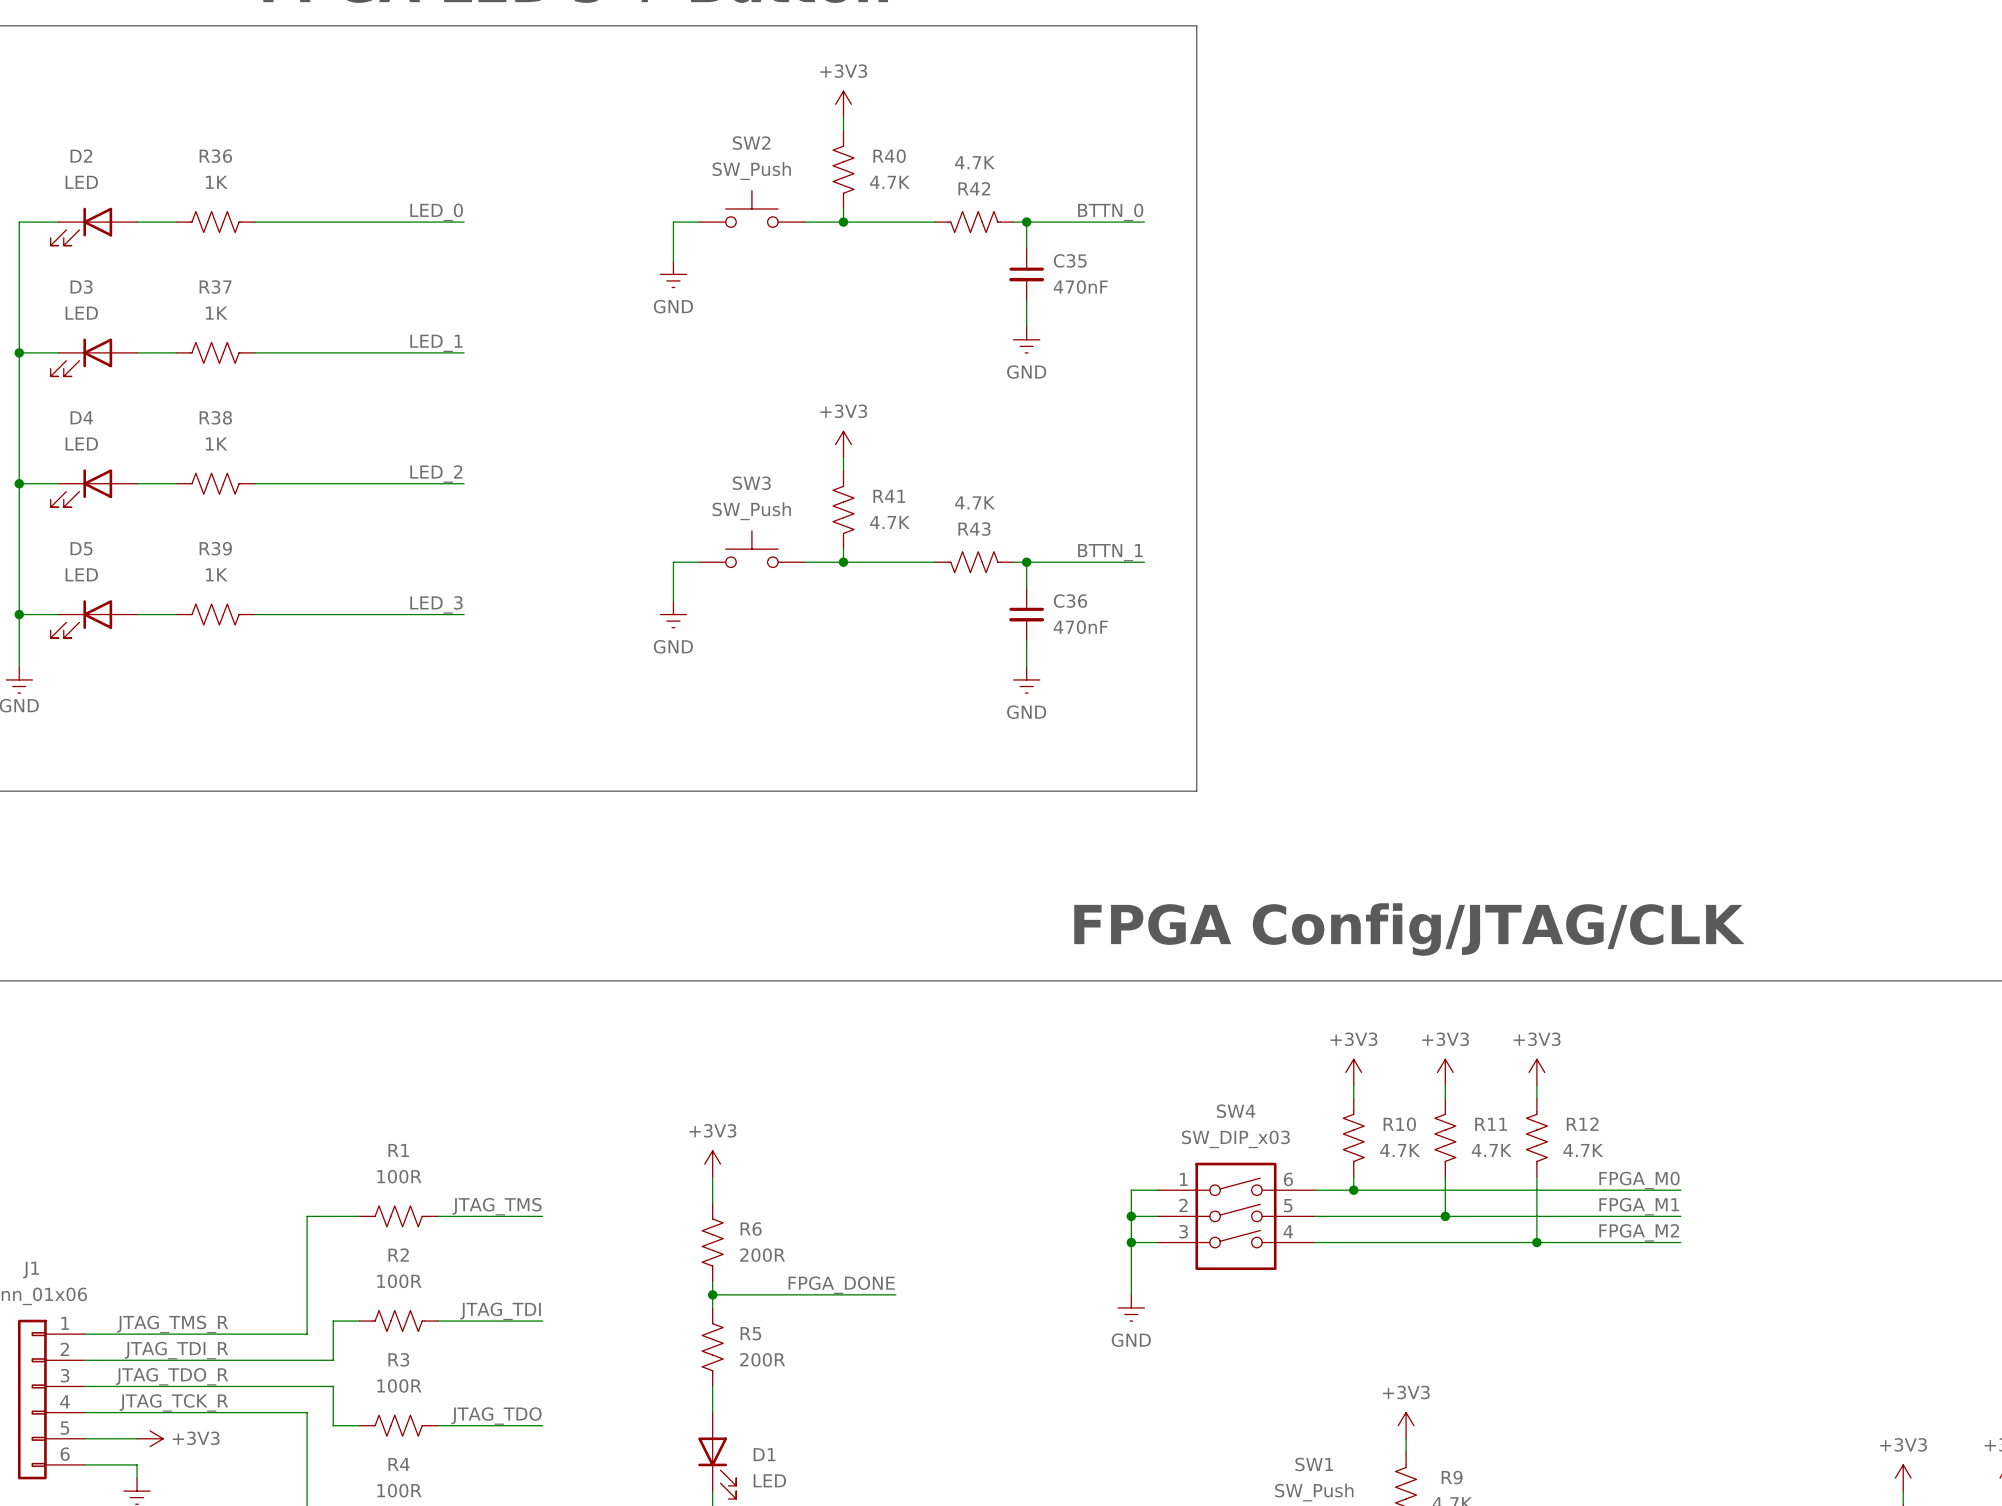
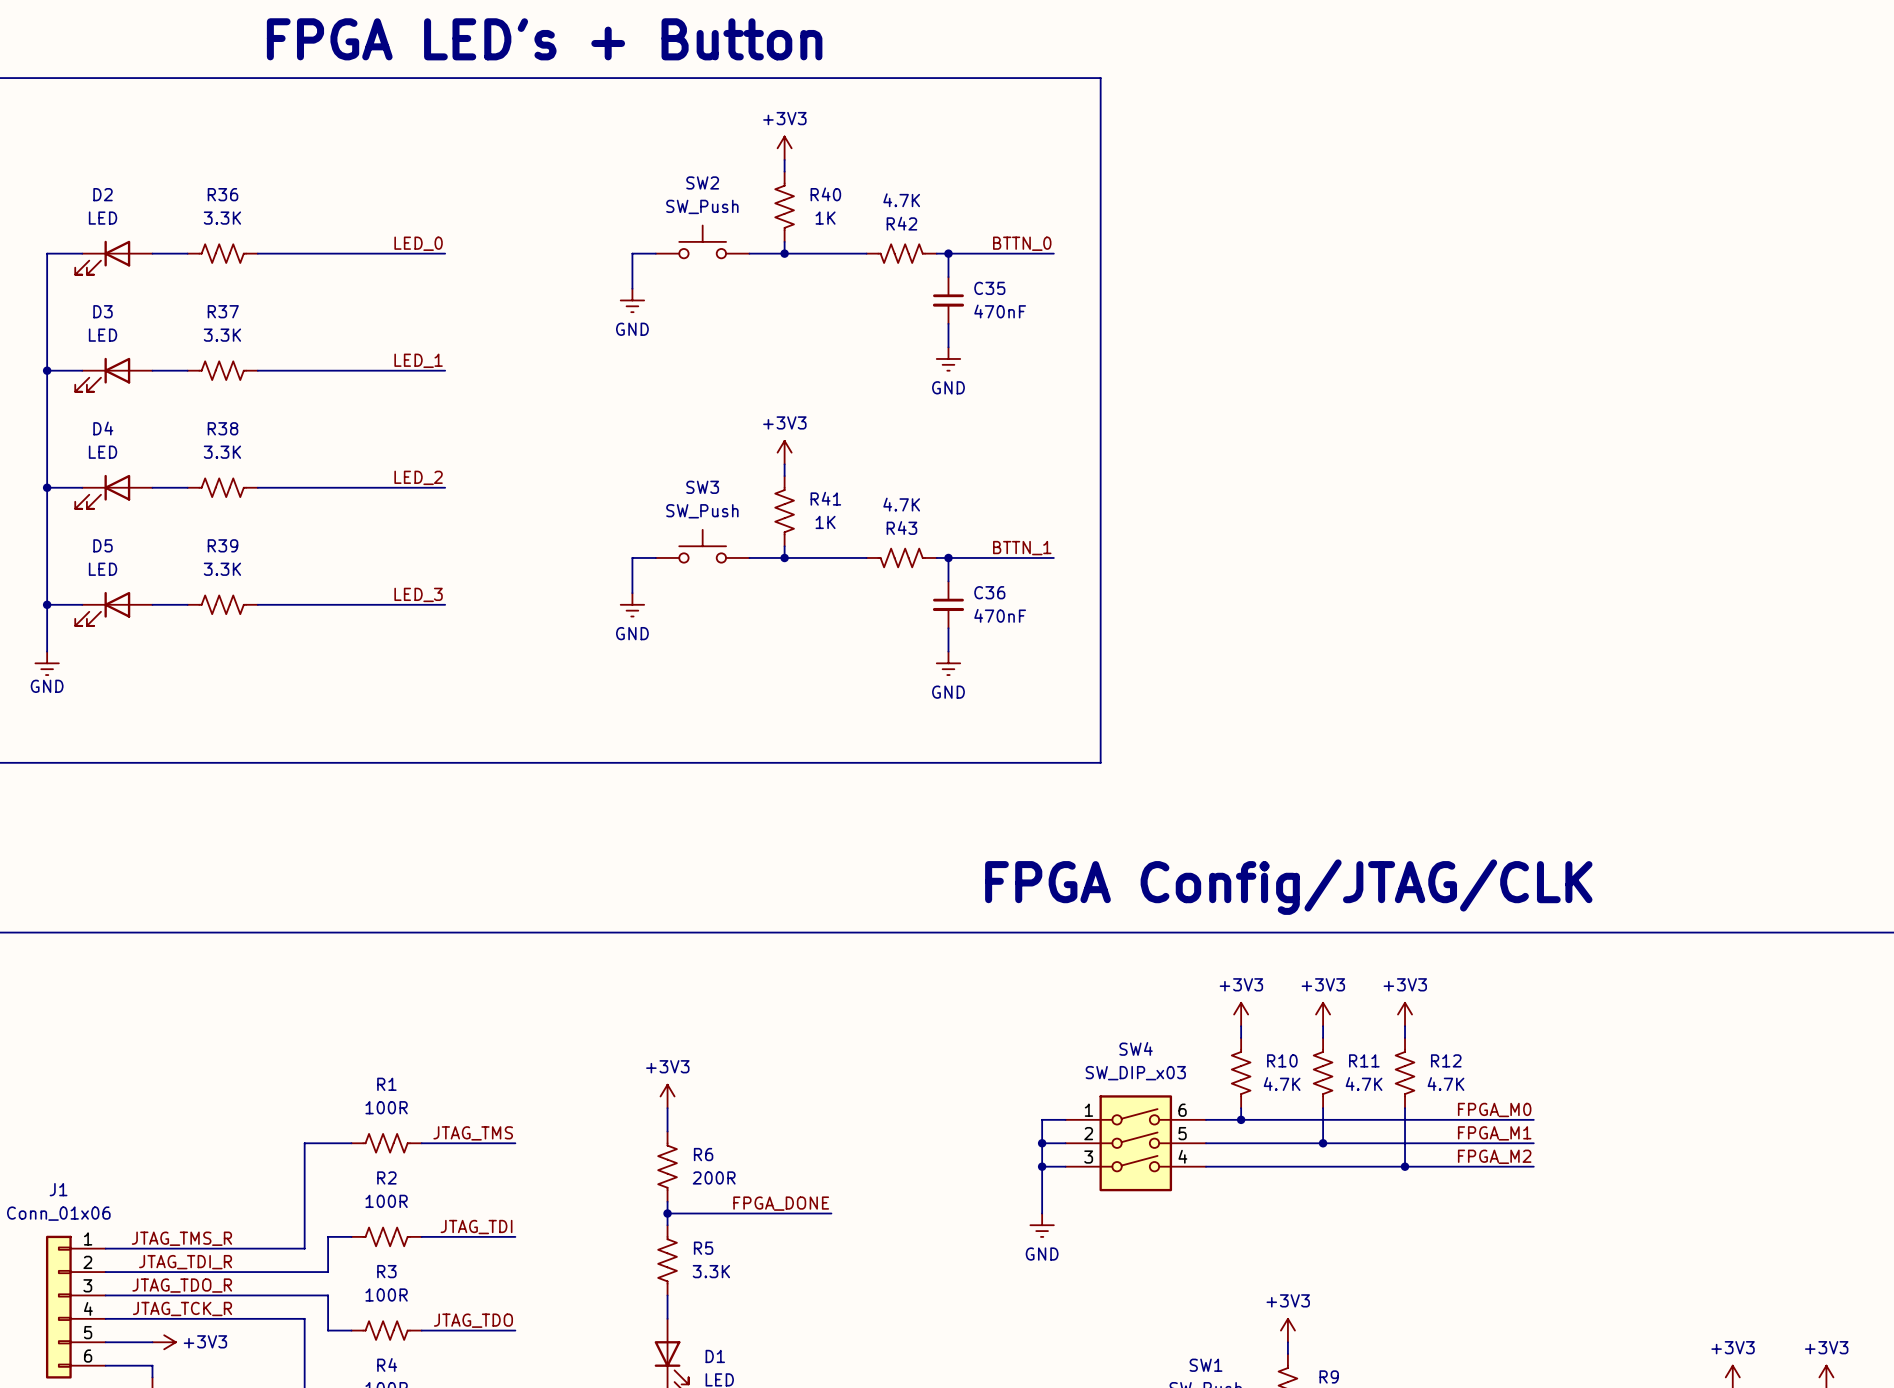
R36 value: 1K (216, 182) -> 3.3K (222, 218)
R40 value: 4.7K (889, 182) -> 1K (825, 218)
R37 value: 1K (216, 313) -> 3.3K (222, 335)
R38 value: 1K (216, 443) -> 3.3K (222, 452)
R41 value: 4.7K (889, 522) -> 1K (825, 522)
R39 value: 1K (216, 574) -> 3.3K (222, 569)
R5 value: 200R (762, 1359) -> 3.3K (711, 1271)

